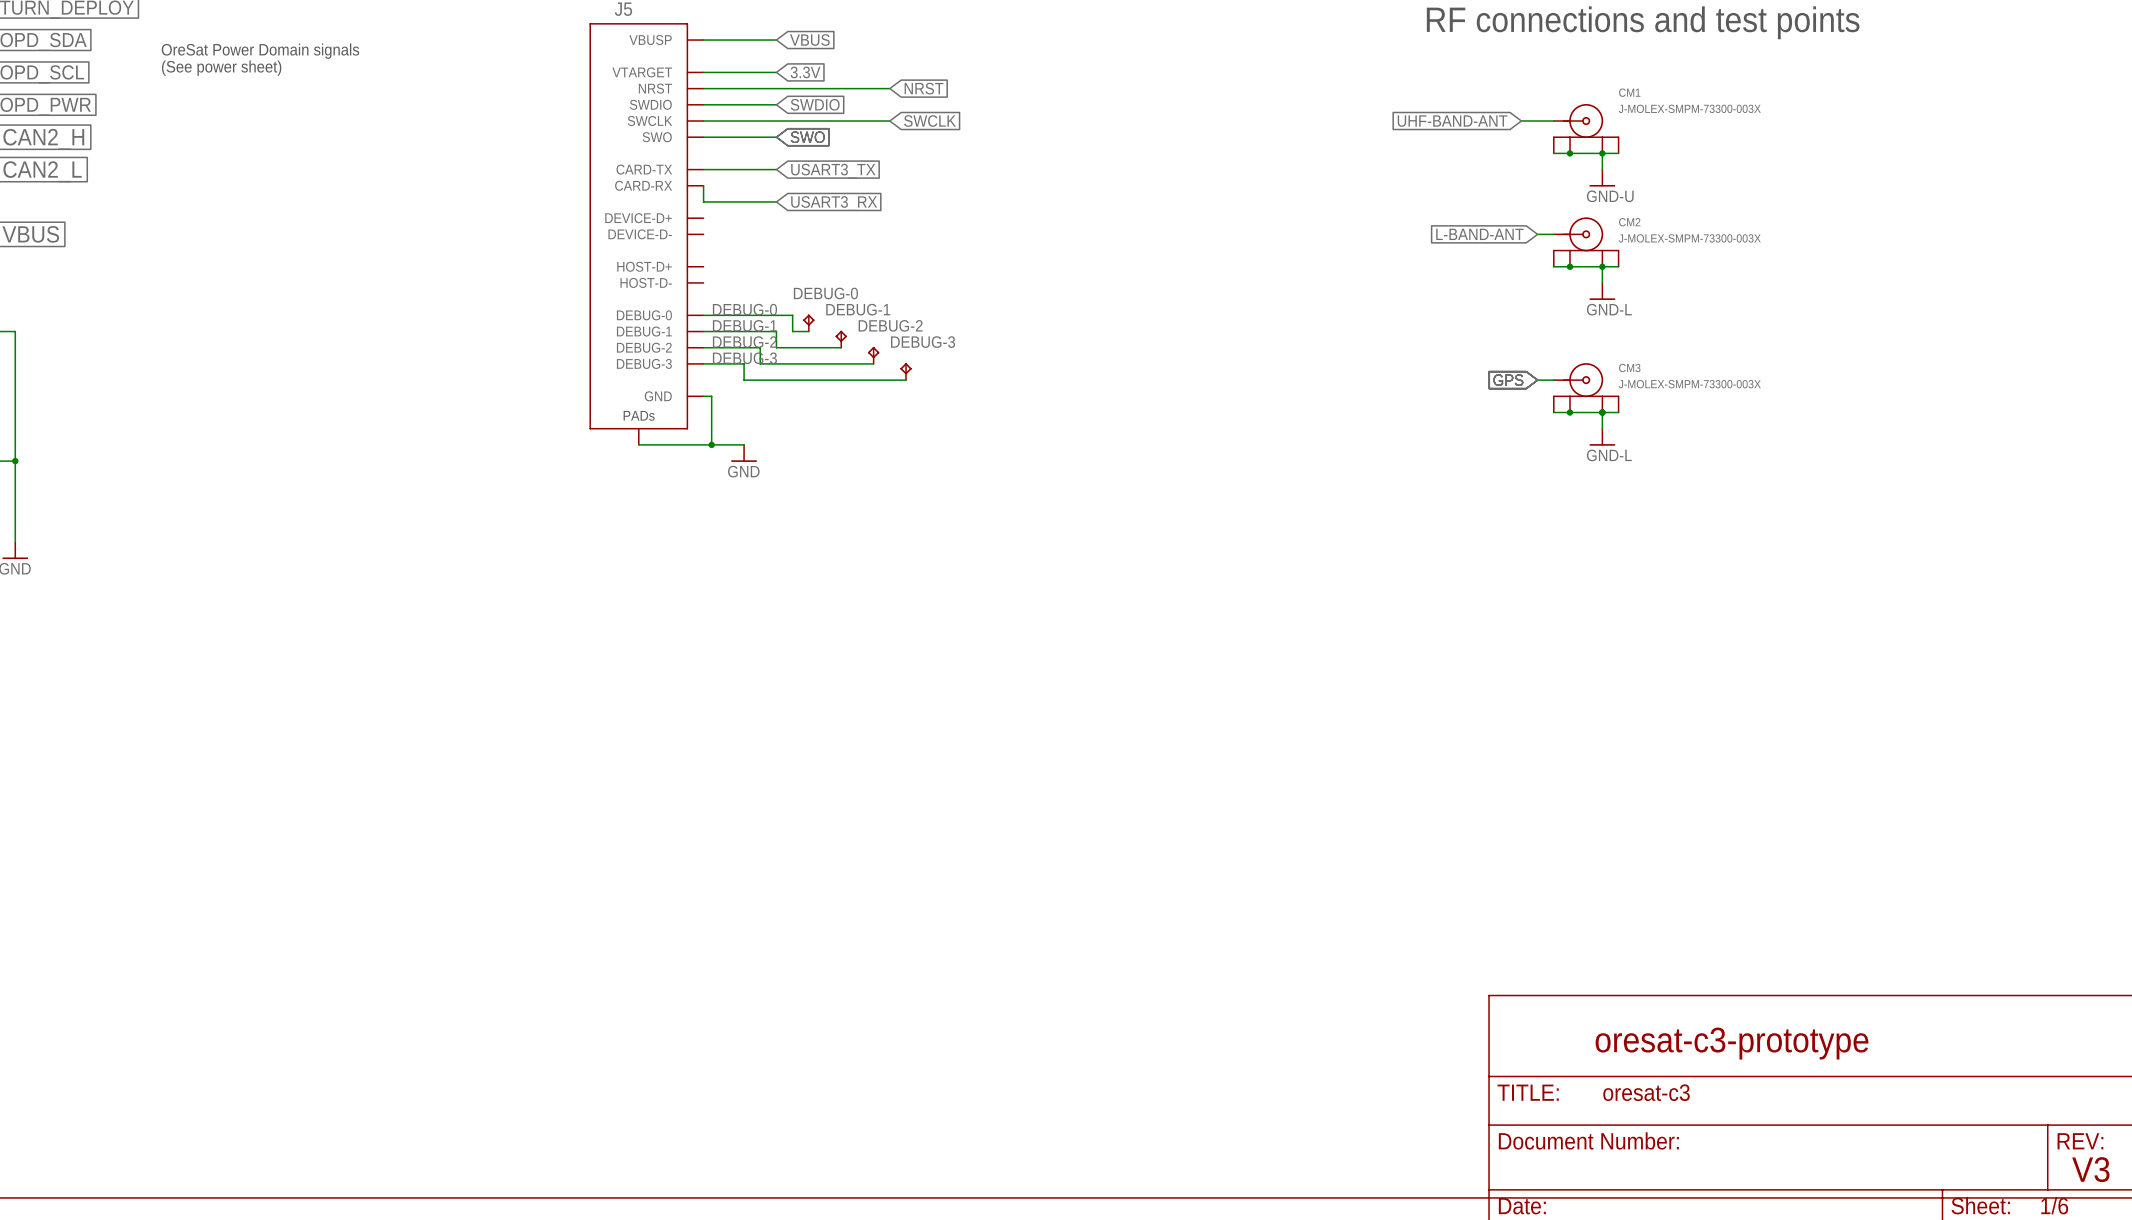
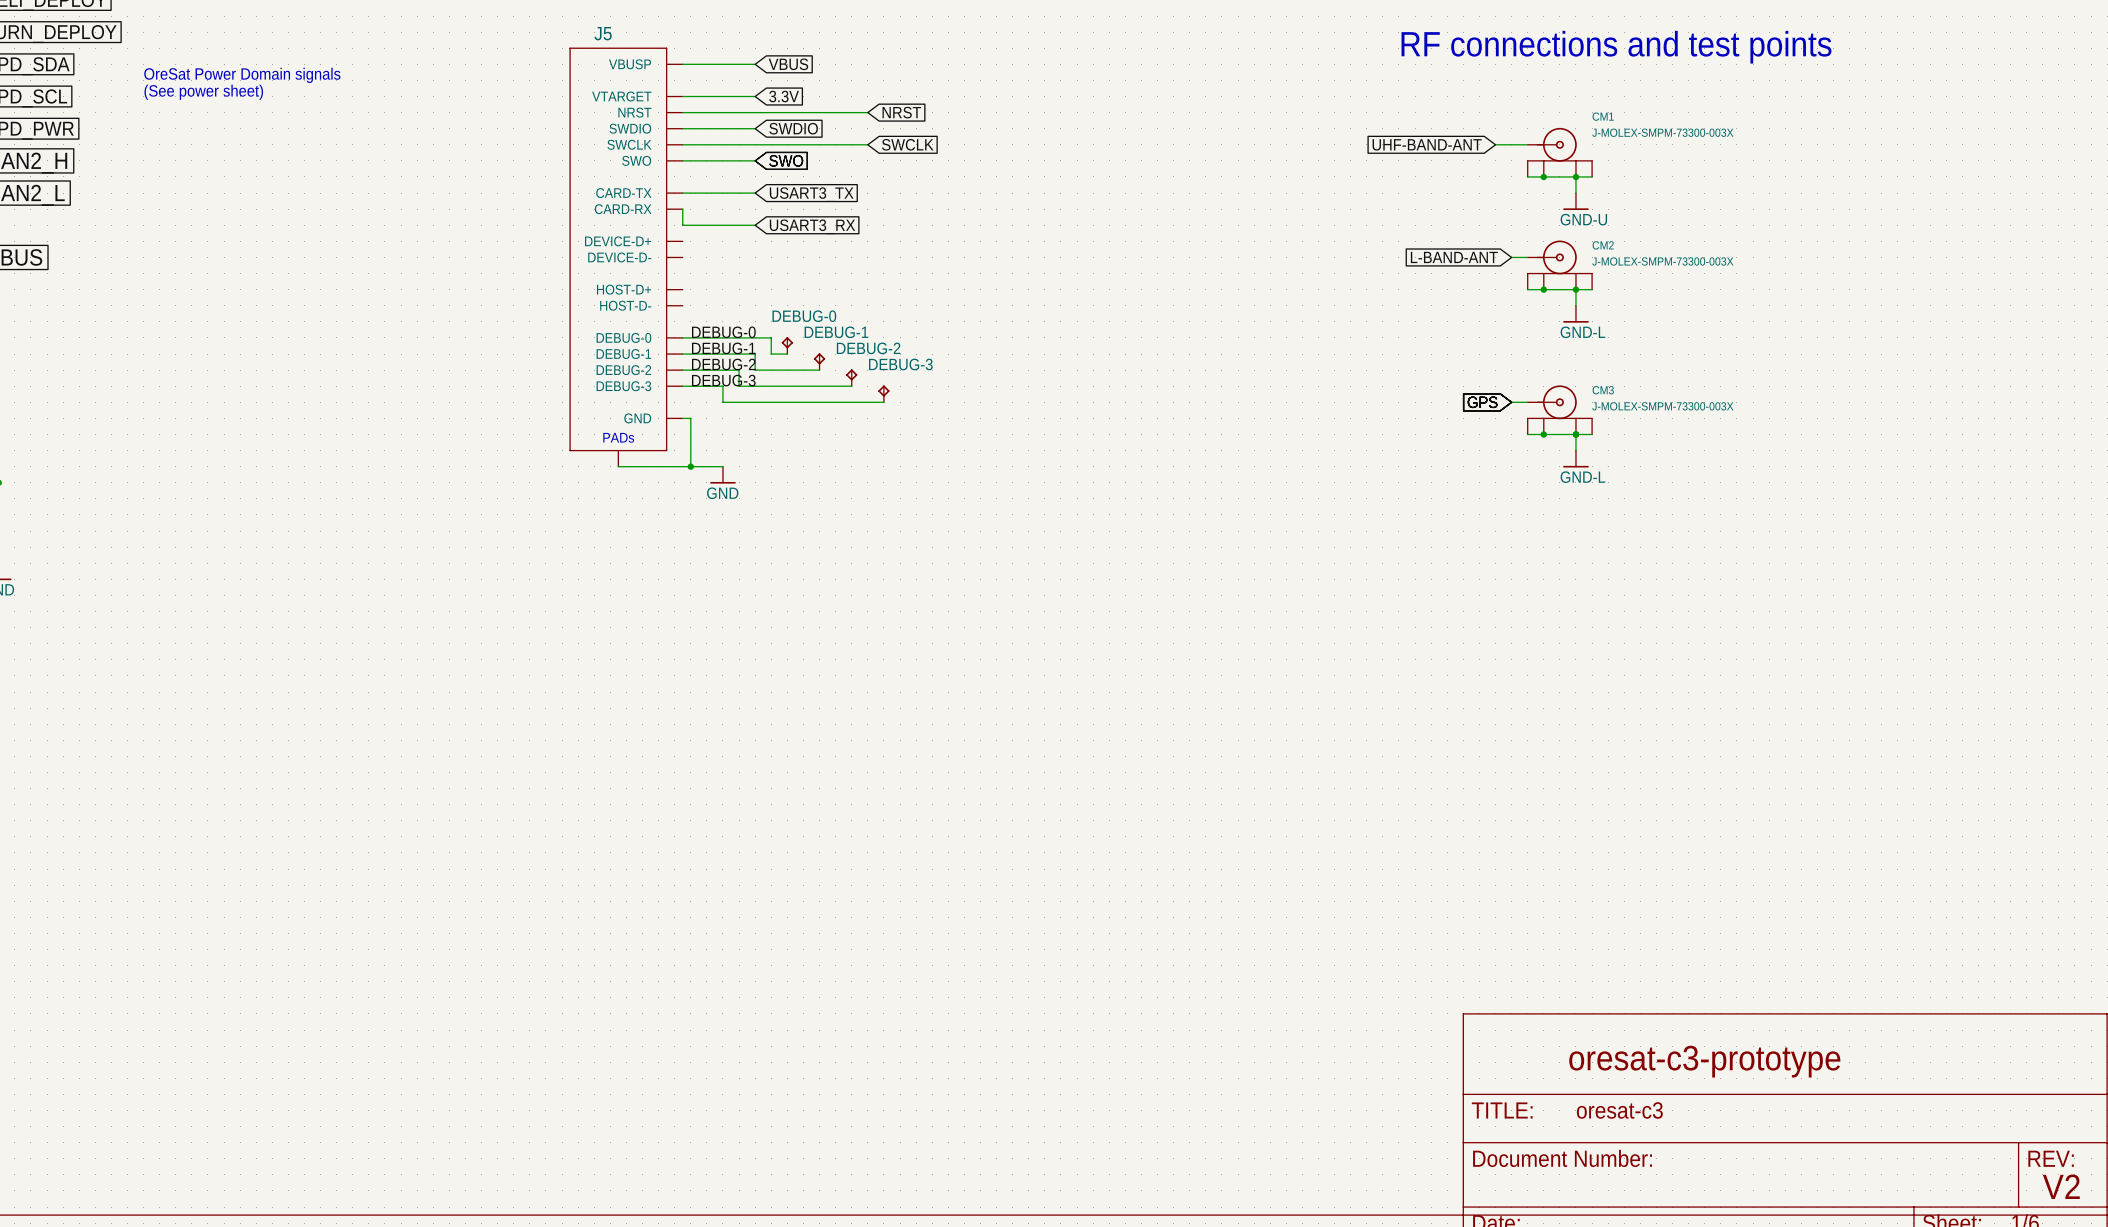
text: V3 (2090, 1169) -> V2 (2061, 1186)

